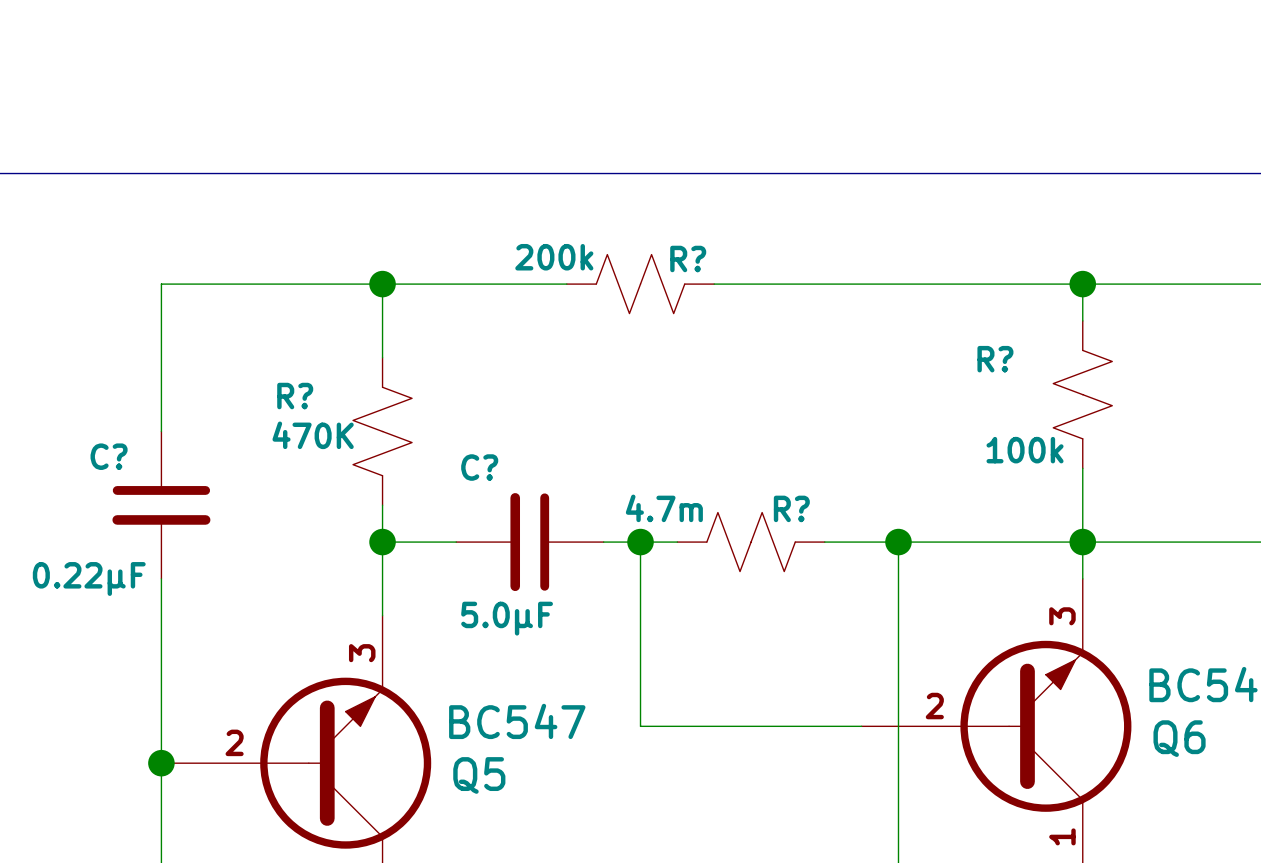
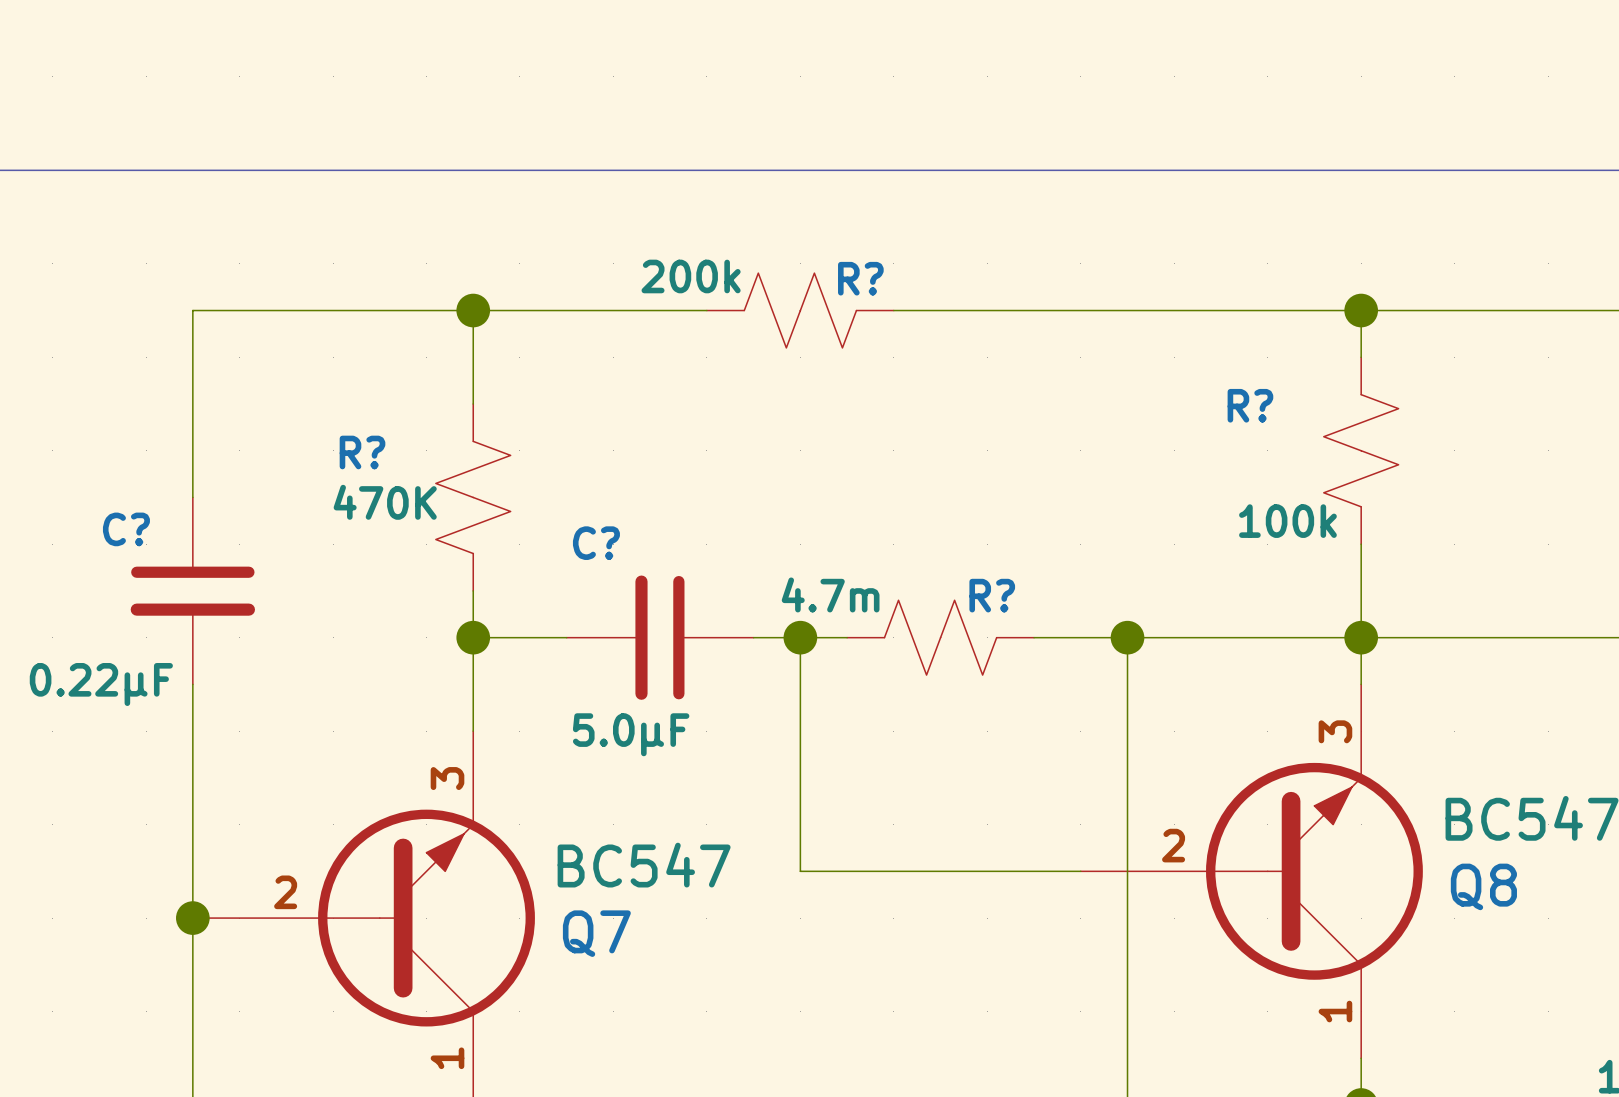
Q6 name: Q6 (1179, 738) -> Q8 (1483, 886)
Q5 name: Q5 (479, 775) -> Q7 (596, 933)

